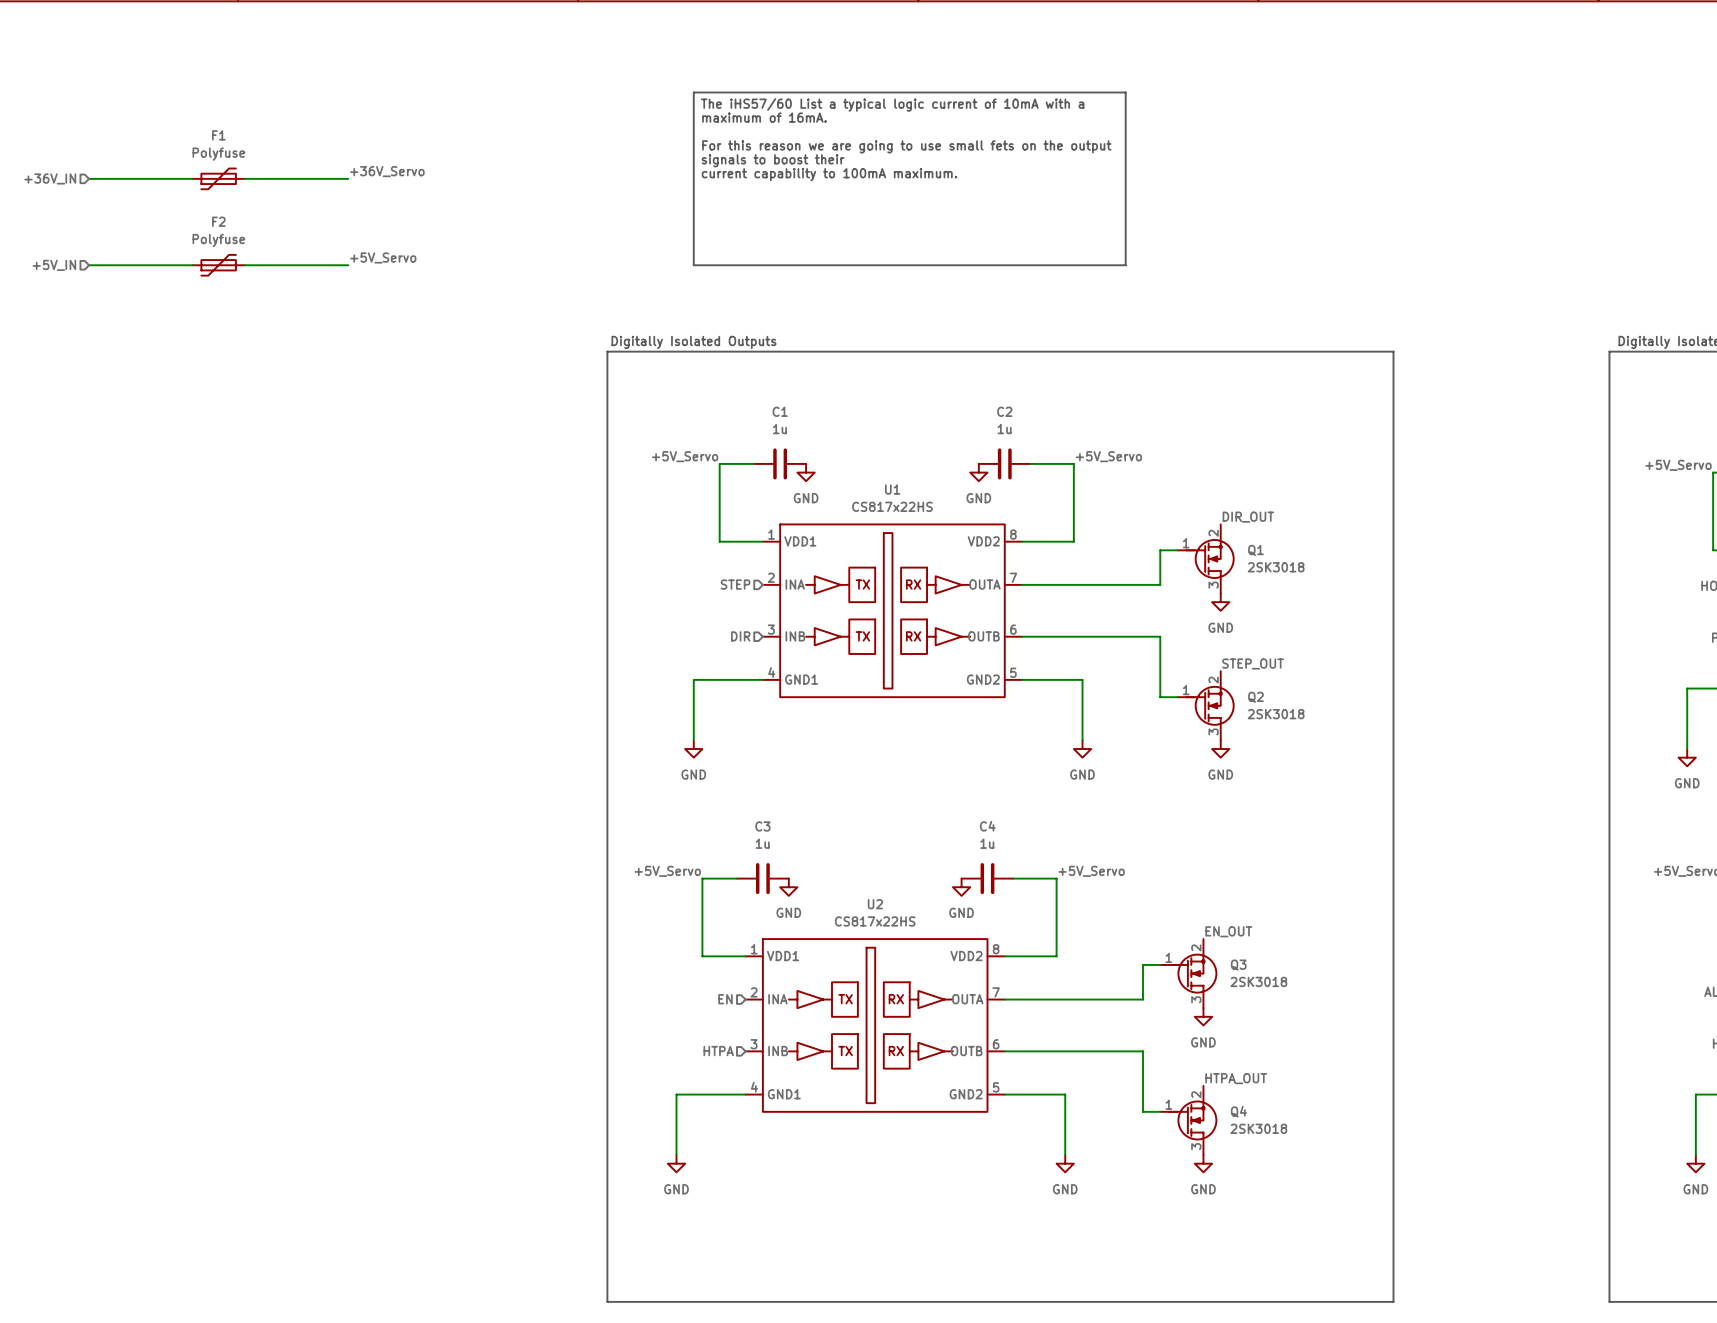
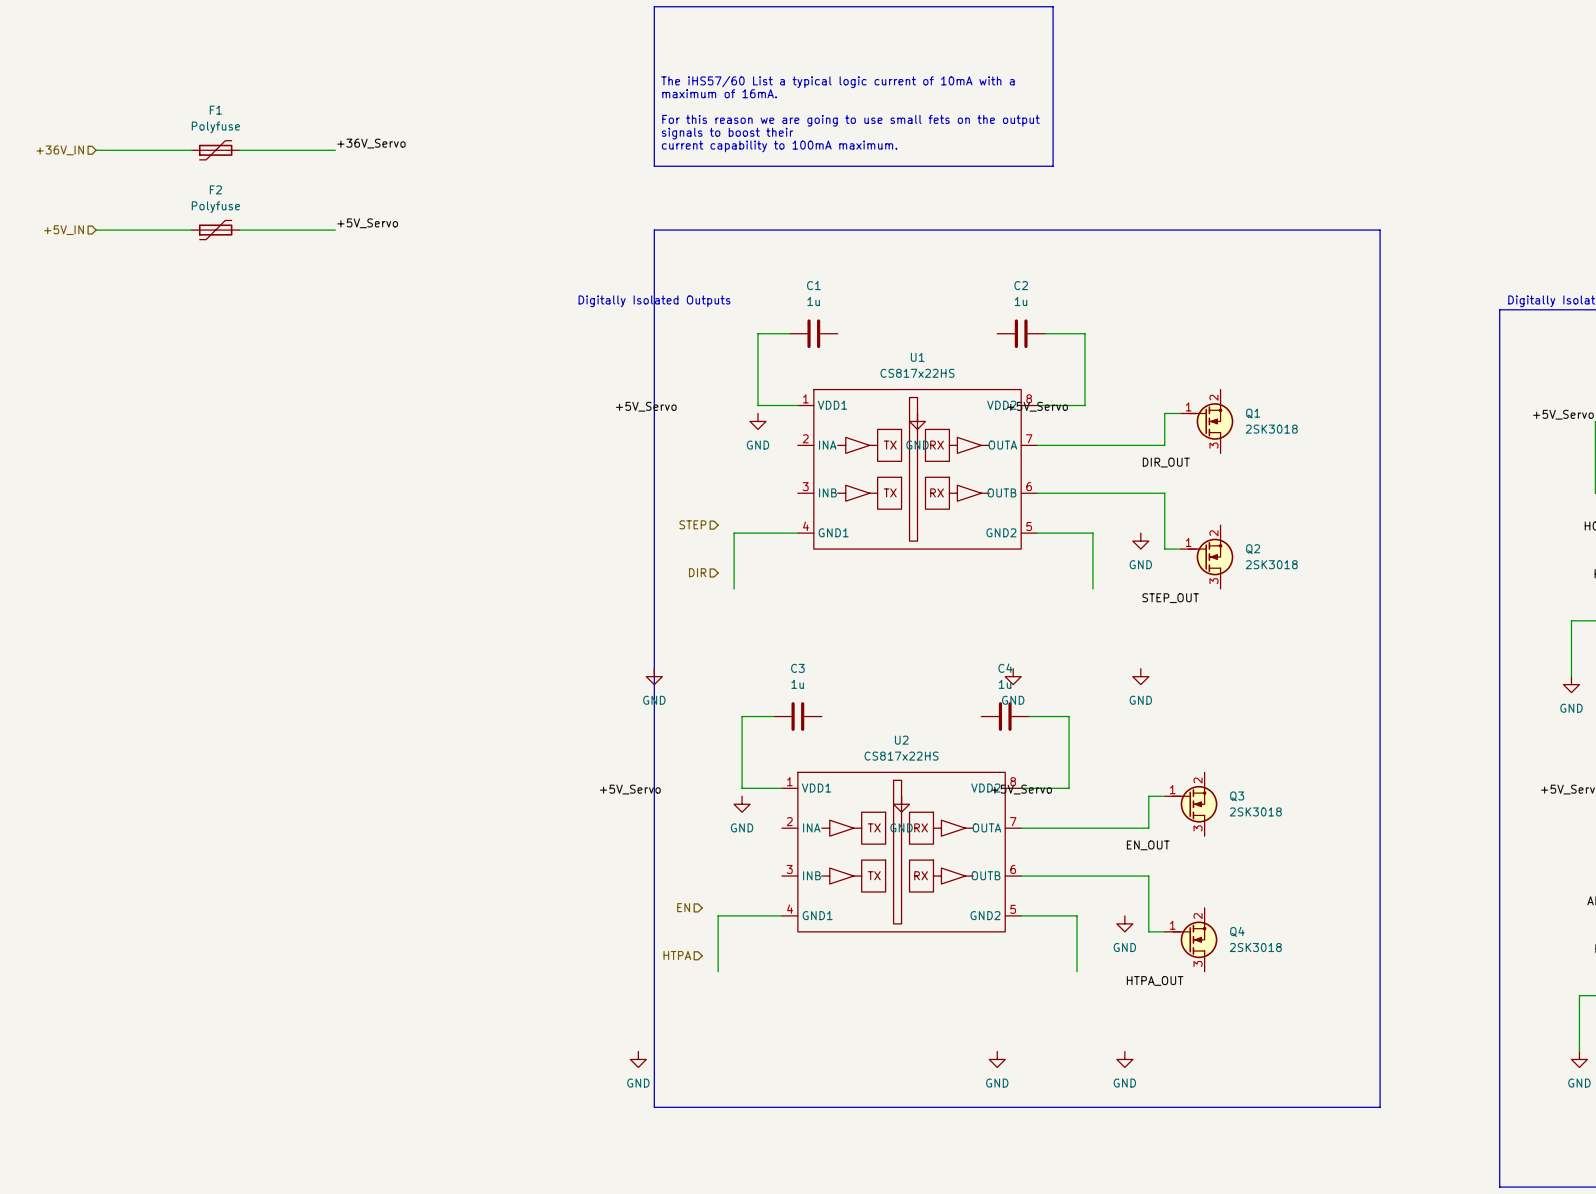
line: (693, 92) (1125, 92) -> (654, 70) (654, 6) (1053, 6) (1053, 70)
line: (693, 196) (693, 265) -> (654, 166) (1053, 166)
line: (1125, 196) (1125, 265) -> (654, 230) (654, 1107) (1380, 1107) (1380, 230) (1053, 230)
line: (607, 351) (1393, 351) (1393, 1301) (607, 1301) (607, 351) -> none
wire: (754, 463) (719, 463) (719, 541) (762, 541) -> (789, 333) (758, 333) (758, 405) (797, 405)
C1 position: (780, 463) -> (813, 333)
C2 position: (1004, 463) -> (1021, 333)
wire: (1030, 463) (1073, 463) (1073, 541) (1022, 541) -> (1045, 333) (1084, 333) (1084, 405) (1037, 405)
wire: none -> (1180, 413) (1164, 413) (1164, 445) (1037, 445)
wire: (1160, 550) (1160, 584) (1022, 584) -> (1084, 493) (1037, 493)
wire: none -> (1100, 493) (1164, 493) (1164, 549) (1180, 549)
Q1 position: (1206, 558) -> (1207, 421)
U1 position: (892, 610) -> (917, 469)
wire: (1022, 636) (1160, 636) (1160, 697) (1177, 697) -> none
wire: (762, 679) (693, 679) (693, 740) -> (797, 533) (734, 533) (734, 588)
wire: (1022, 679) (1082, 679) (1082, 740) -> (1037, 533) (1092, 533) (1092, 588)
Q2 position: (1206, 705) -> (1207, 557)
wire: (736, 878) (702, 878) (702, 956) (745, 956) -> (773, 716) (742, 716) (742, 788) (781, 788)
C3 position: (762, 878) -> (797, 716)
C4 position: (987, 878) -> (1005, 716)
wire: (1013, 878) (1056, 878) (1056, 956) (1004, 956) -> (1029, 716) (1069, 716) (1069, 788) (1021, 788)
wire: none -> (1164, 796) (1148, 796) (1148, 828) (1021, 828)
wire: (1142, 964) (1142, 999) (1004, 999) -> (1069, 876) (1021, 876)
wire: none -> (1084, 876) (1148, 876) (1148, 931) (1164, 931)
Q3 position: (1188, 973) -> (1191, 804)
U2 position: (875, 1025) -> (901, 852)
wire: (1004, 1051) (1142, 1051) (1142, 1111) (1160, 1111) -> none
wire: (745, 1094) (676, 1094) (676, 1155) -> (781, 915) (718, 915) (718, 971)
wire: (1004, 1094) (1065, 1094) (1065, 1155) -> (1021, 915) (1077, 915) (1077, 971)
Q4 position: (1188, 1120) -> (1191, 939)

